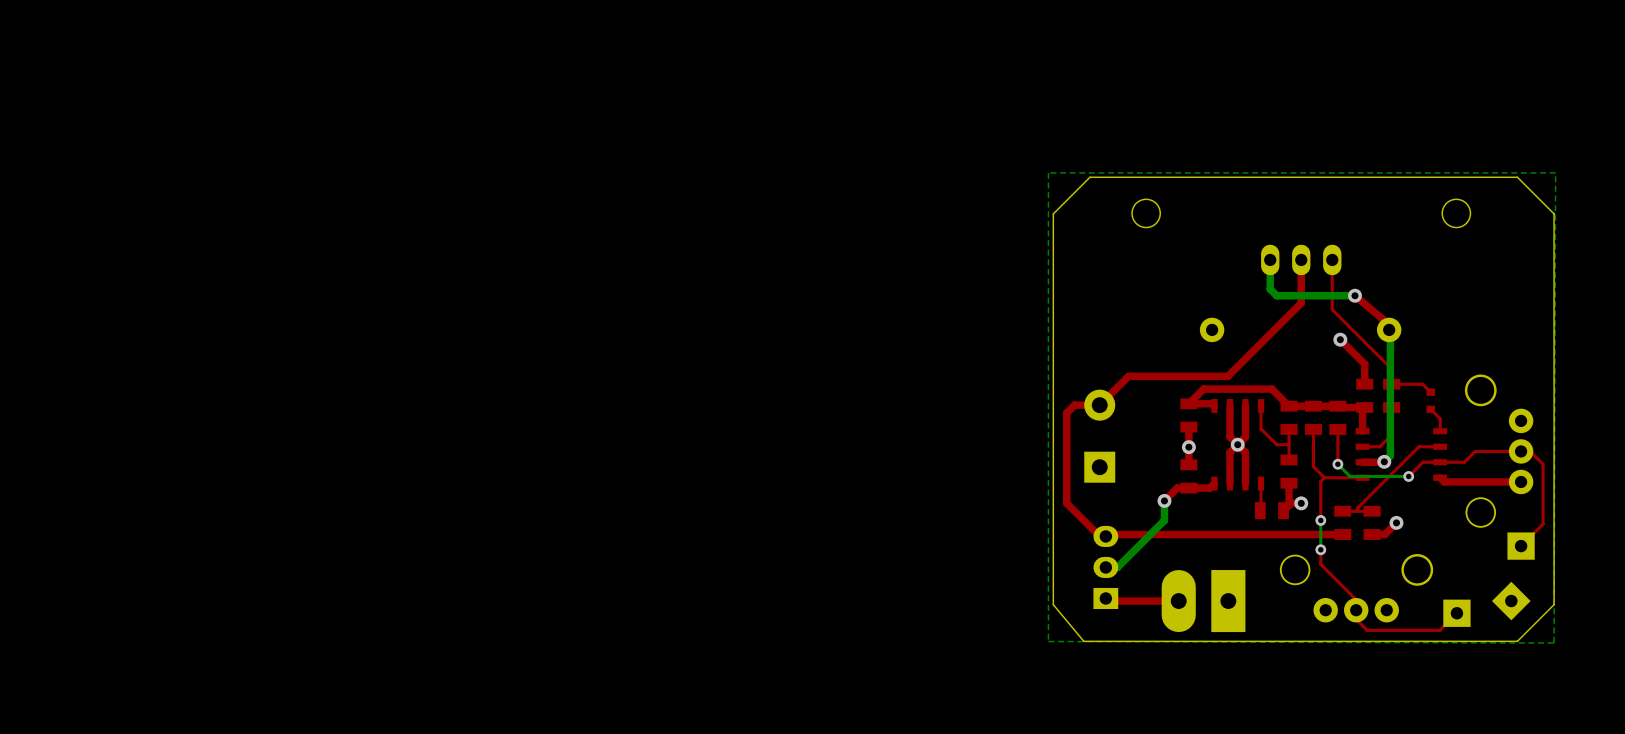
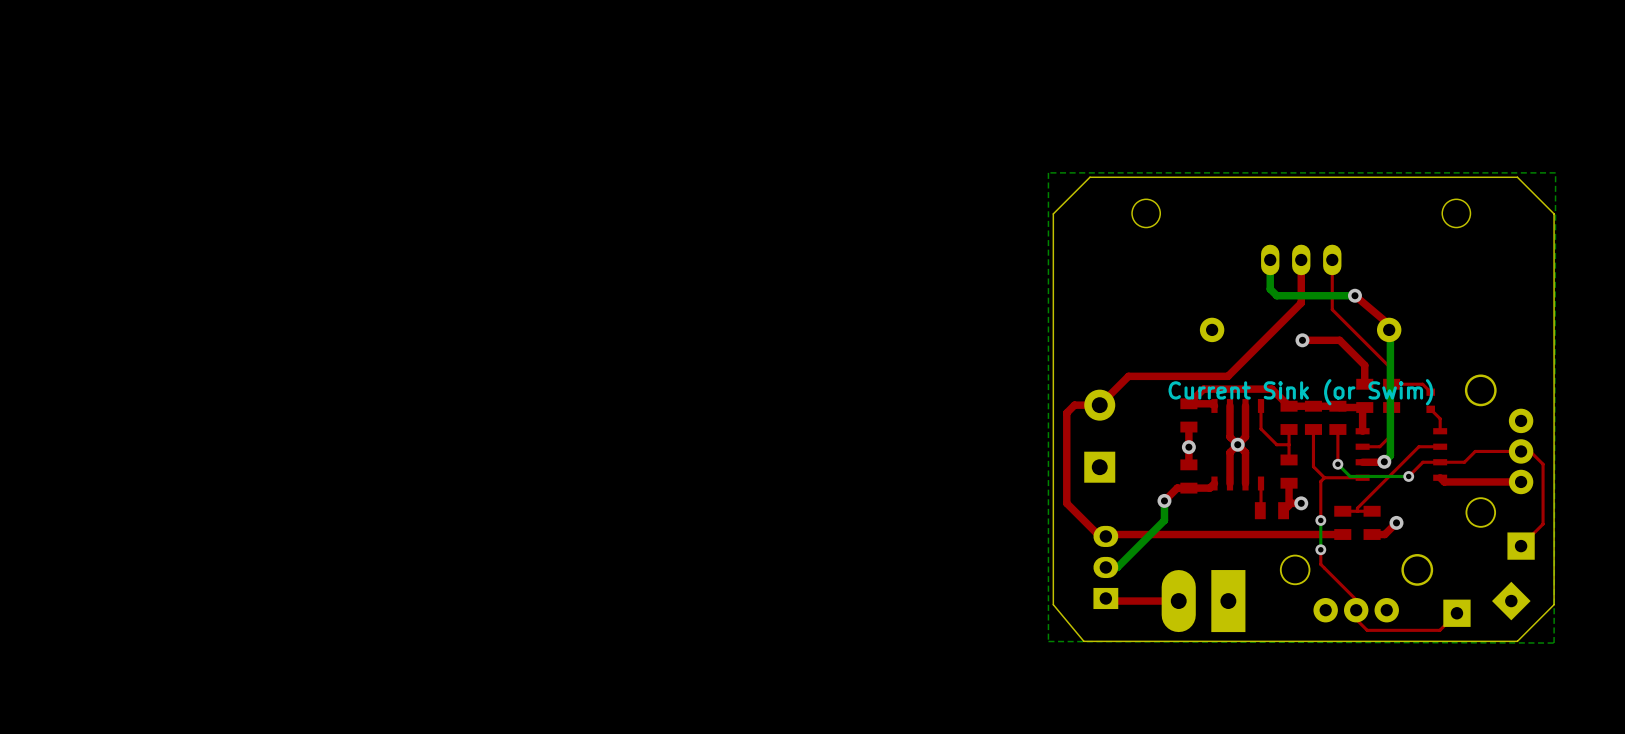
top track: (1340, 339) (1364, 365) -> (1302, 340) (1339, 340) (1364, 365)
via position: (1340, 339) -> (1302, 340)
text: none -> Current Sink (or Swim) (1300, 392)

